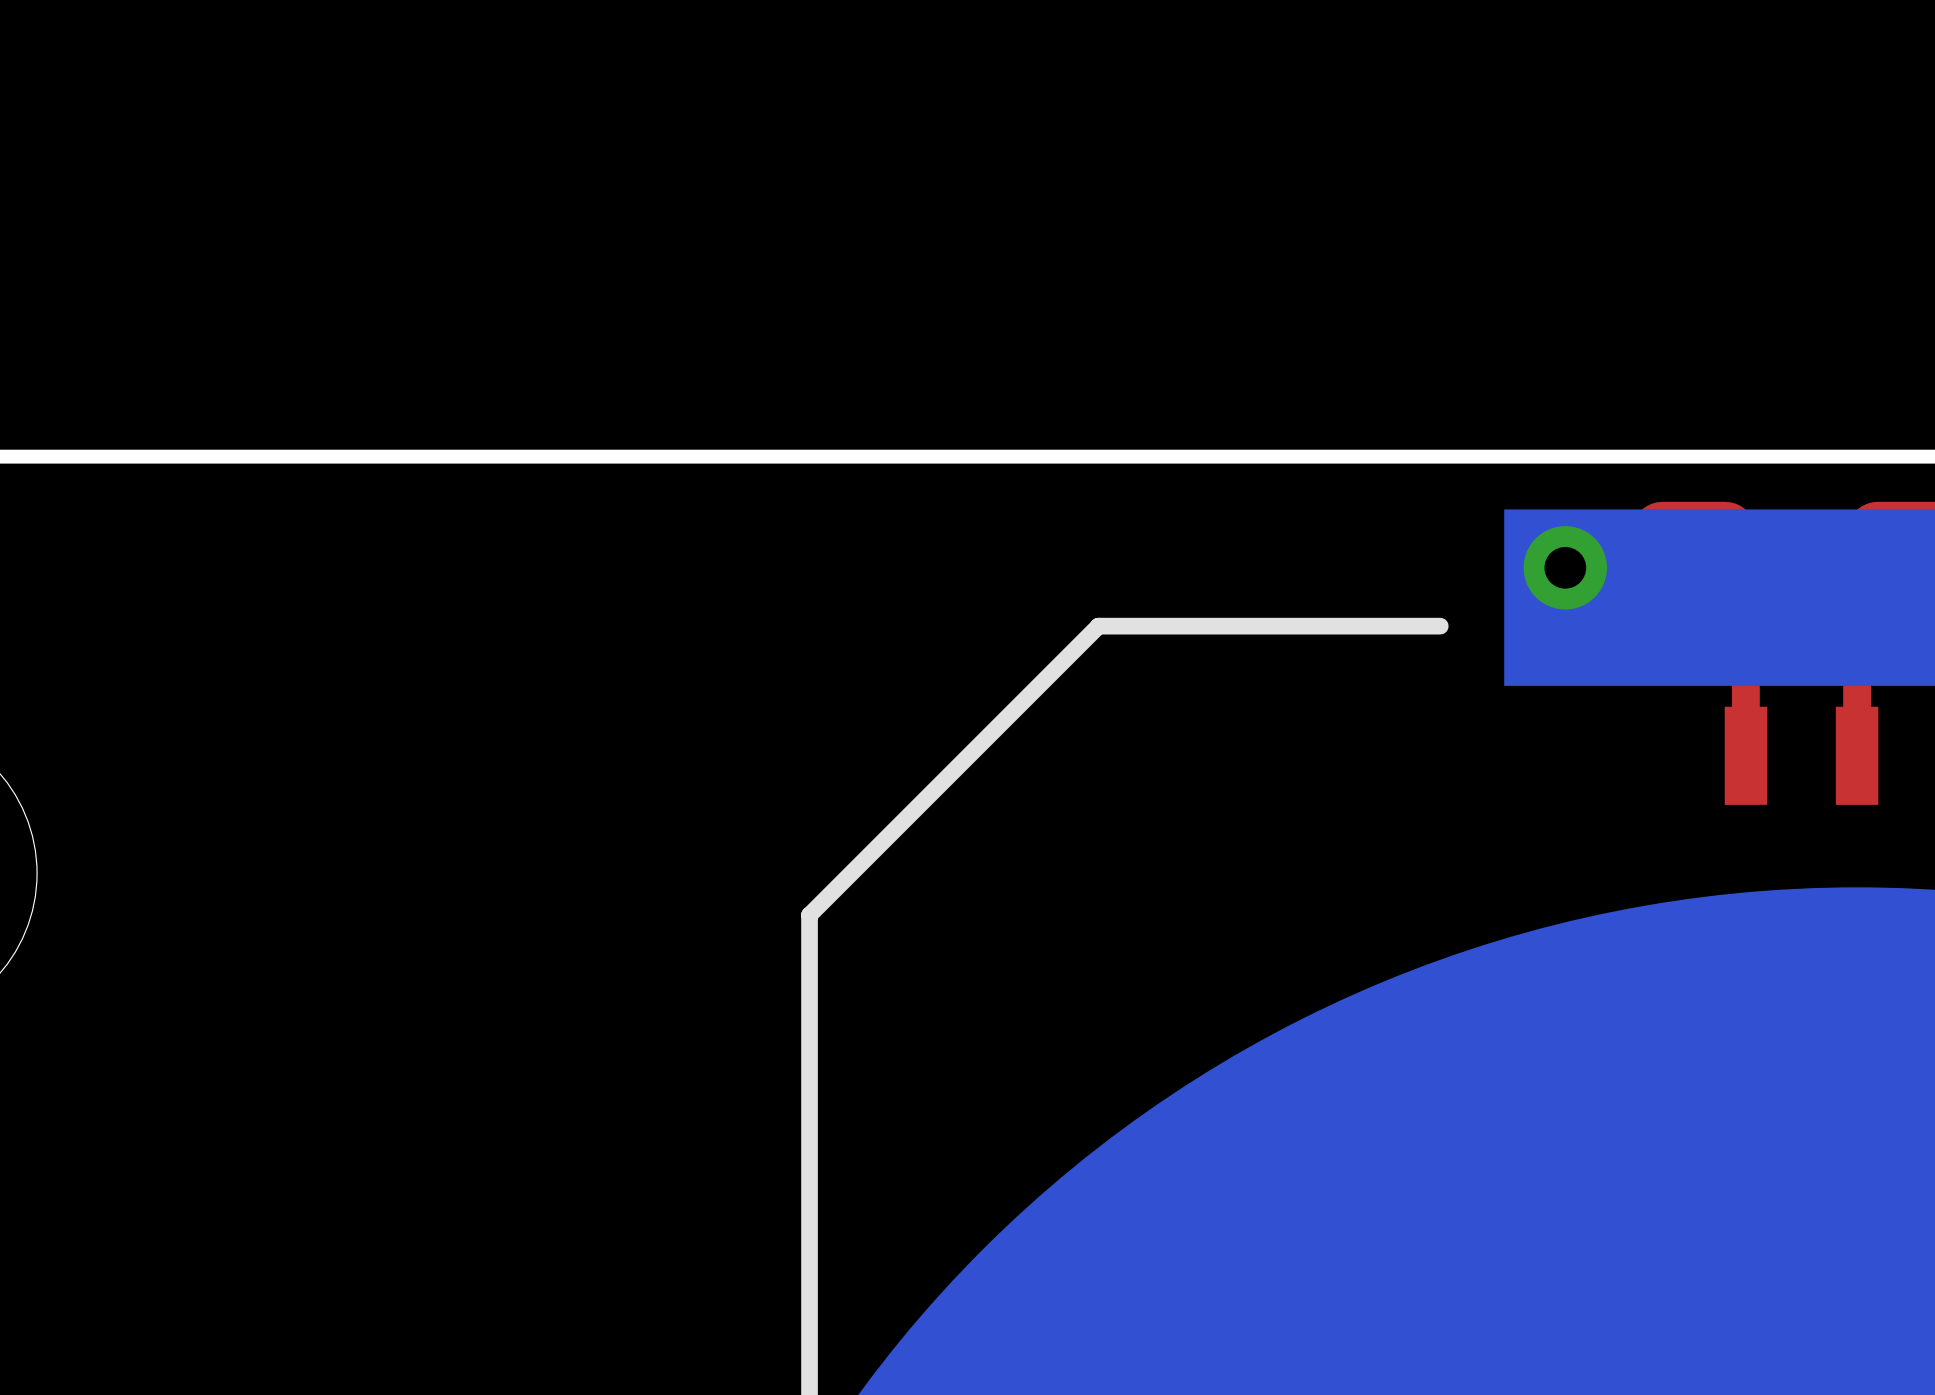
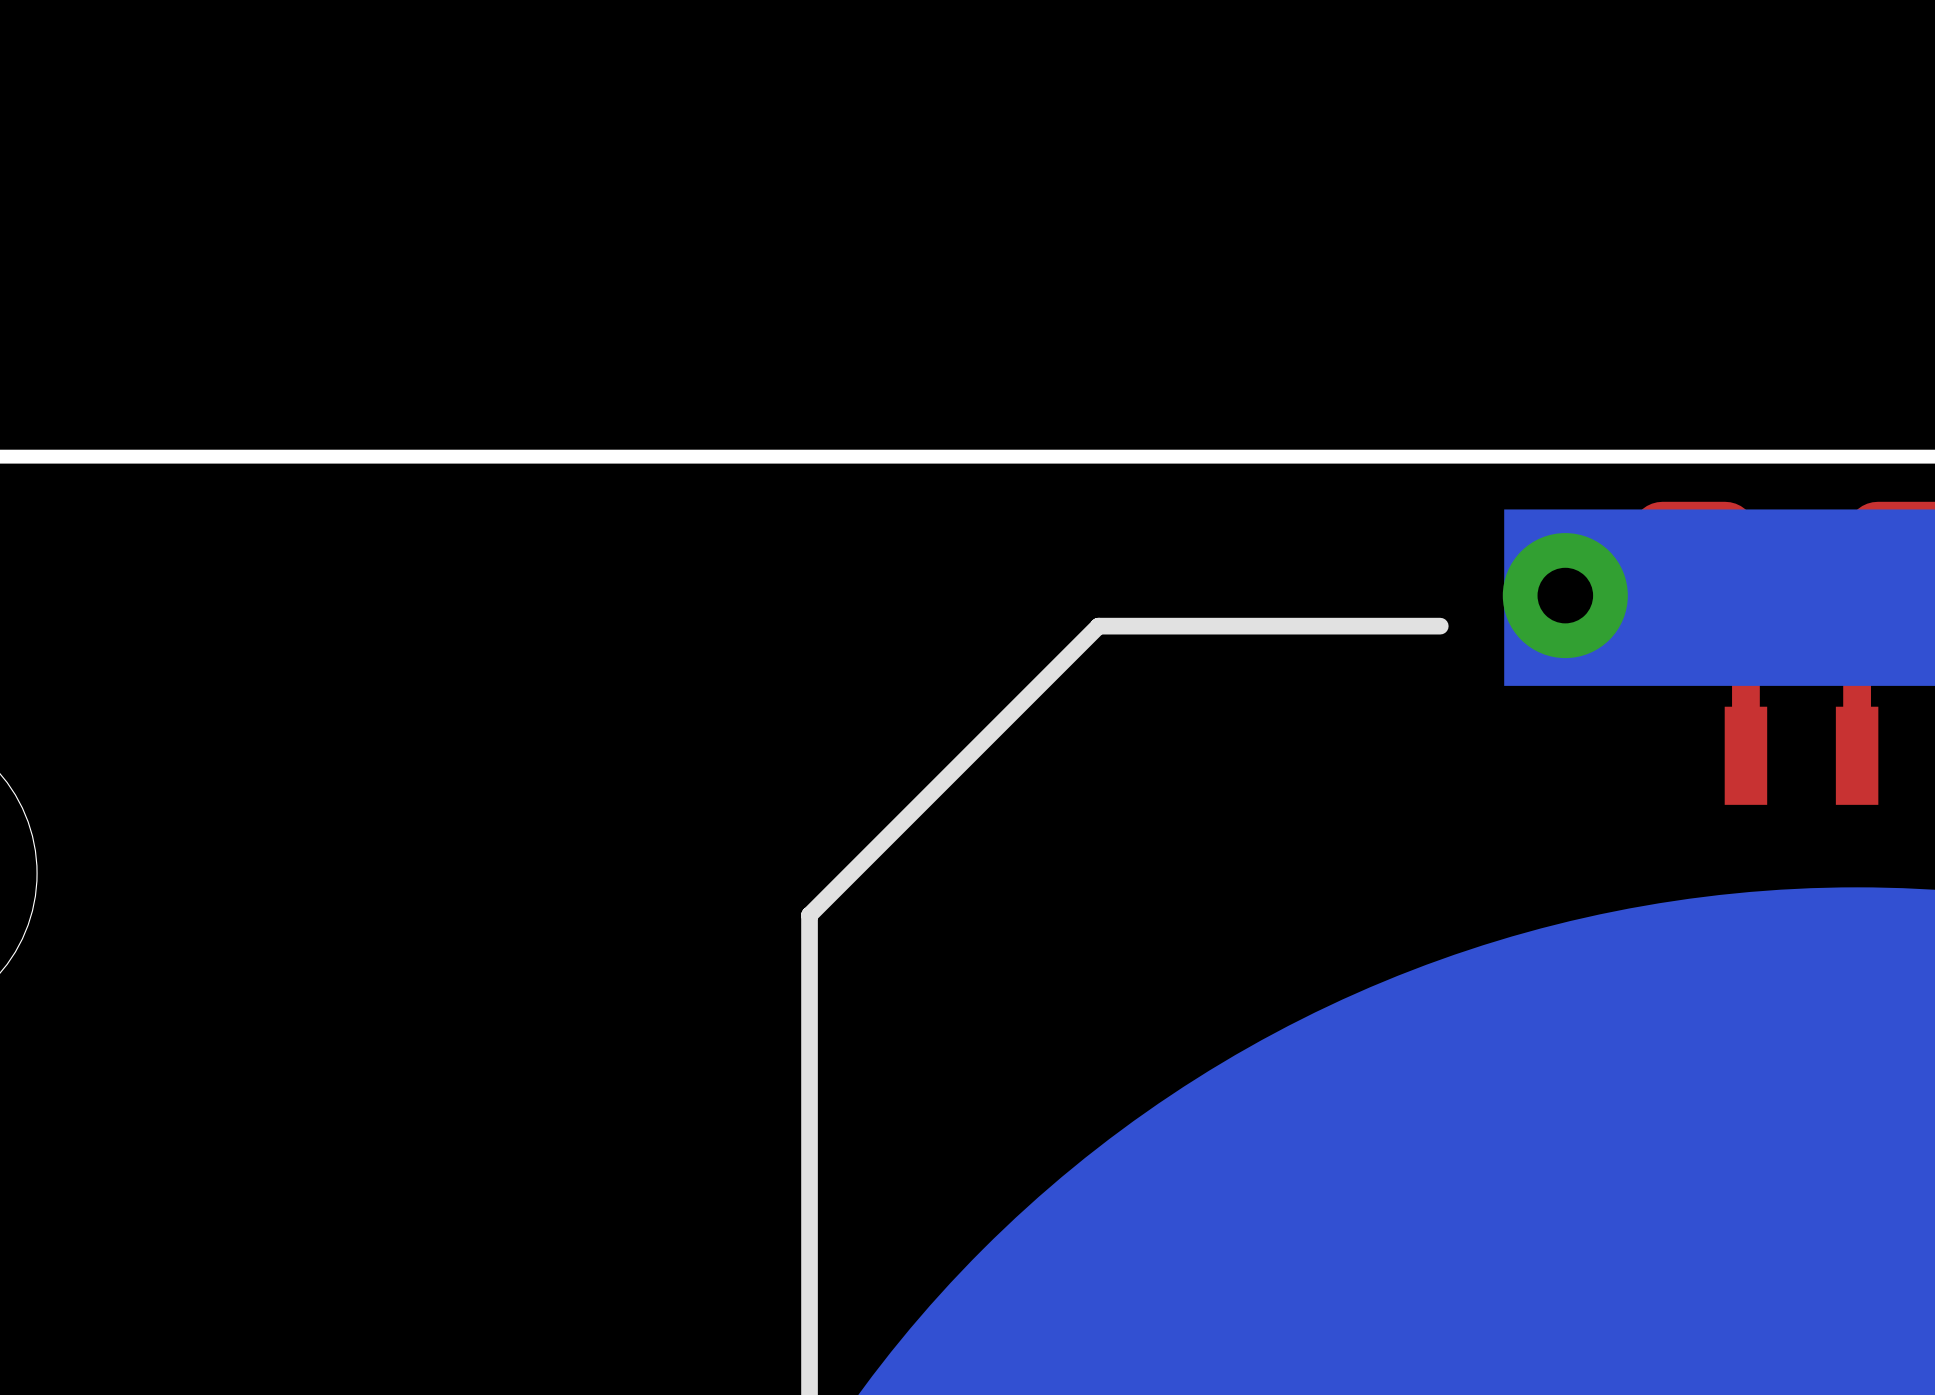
via size: [1523, 526, 1608, 610] -> [1502, 533, 1628, 659]

